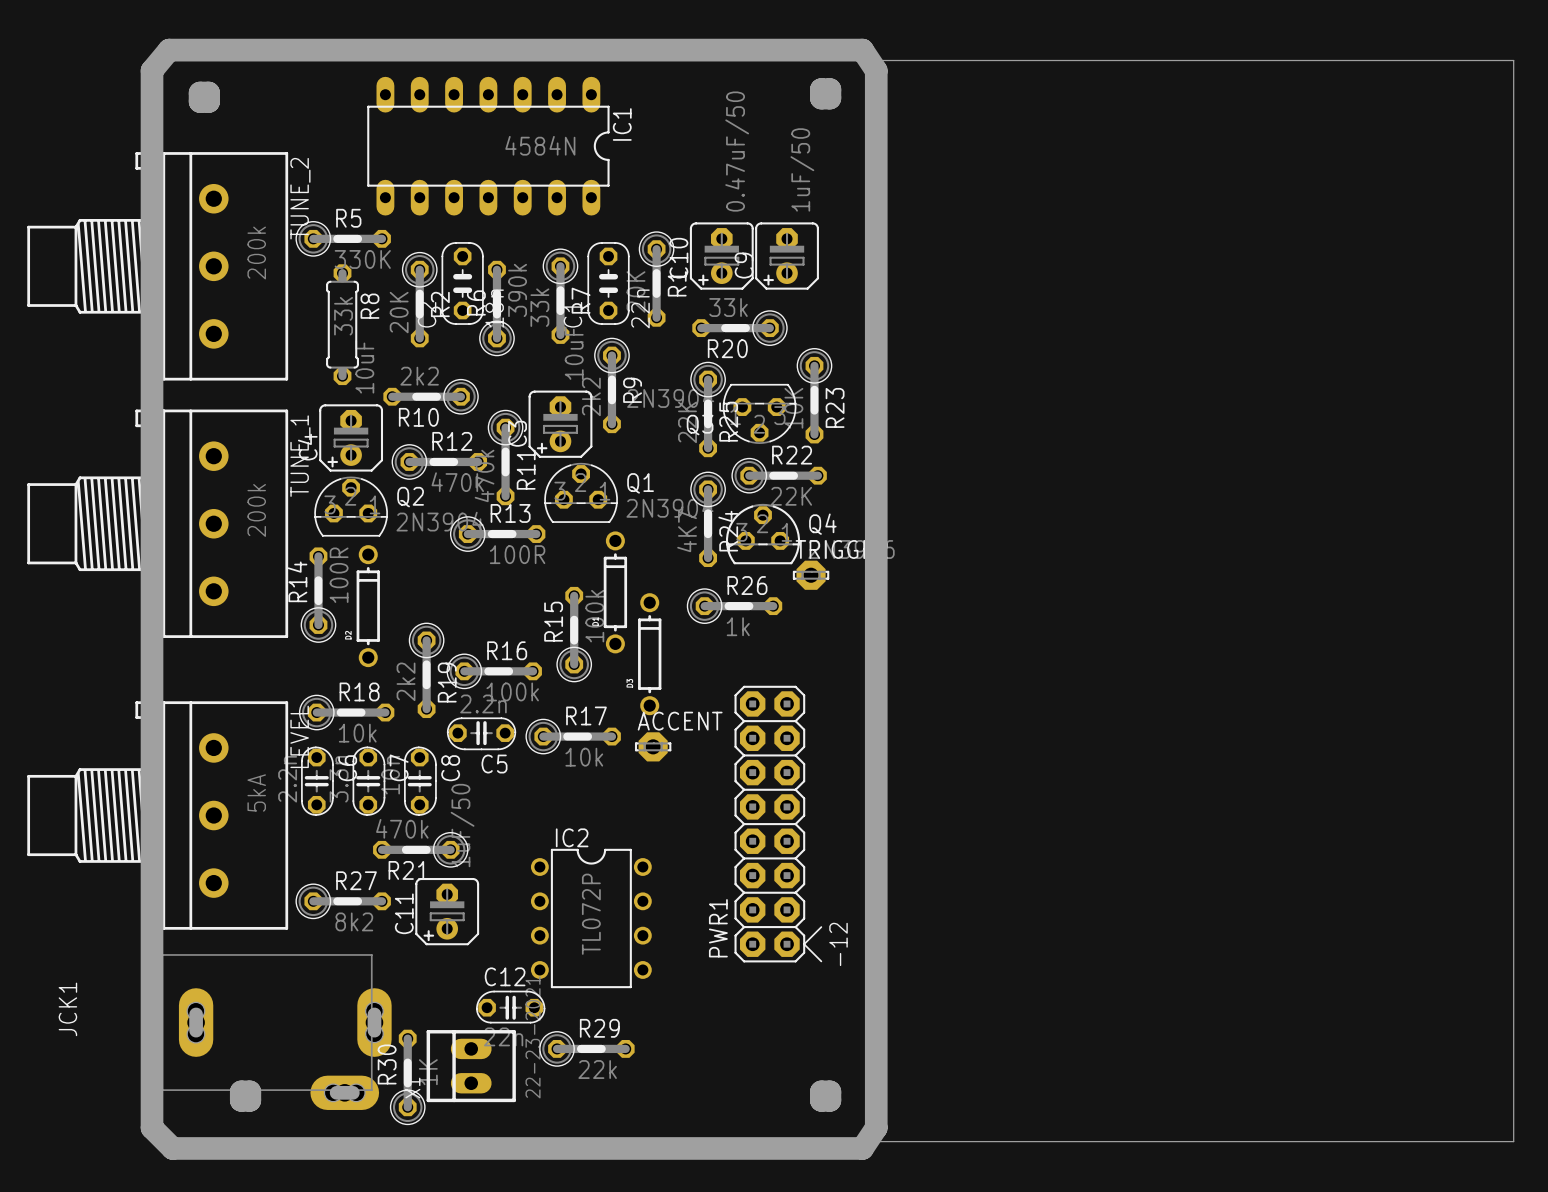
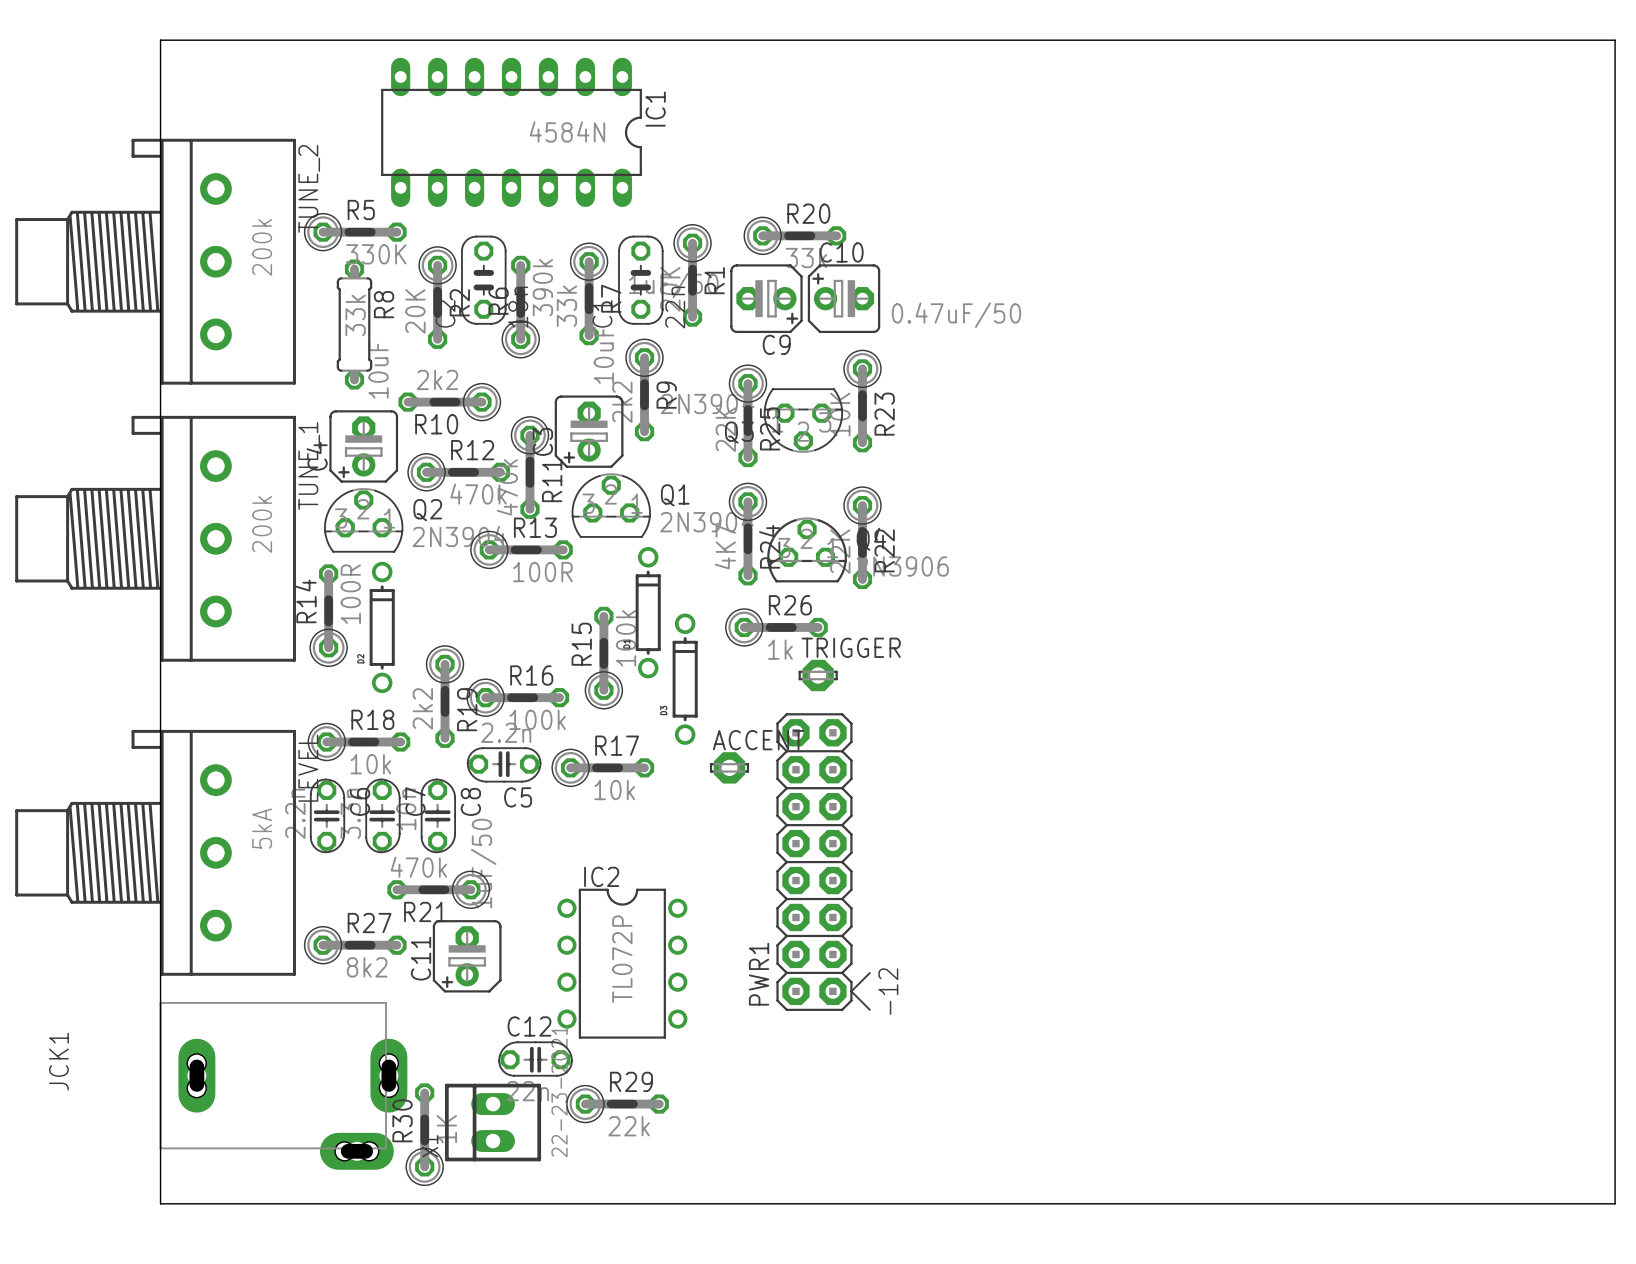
board edge: (169, 50) (862, 50) (876, 70) (876, 1127) (862, 1148) (172, 1148) (152, 1127) (152, 70) (169, 50) -> none
board edge: (821, 89) (821, 98) (829, 98) (829, 89) (821, 89) -> none
board edge: (200, 92) (200, 101) (208, 101) (208, 92) (200, 92) -> none
C10 rotation: 0° (721, 256) -> 90° clockwise (844, 298)
C10 position: (721, 256) -> (844, 298)
C9 rotation: 0° (787, 256) -> 90° counterclockwise (766, 298)
C9 position: (787, 256) -> (766, 298)
R20 rotation: 0° (740, 328) -> 180° (794, 235)
R20 position: (740, 328) -> (794, 235)
R22 rotation: 0° (779, 475) -> 90° clockwise (862, 537)
R22 position: (779, 475) -> (862, 537)
TRIGGER position: (811, 575) -> (818, 675)
ACCENT position: (653, 746) -> (729, 767)
board edge: (241, 1091) (241, 1100) (249, 1100) (249, 1091) (241, 1091) -> none
board edge: (821, 1091) (821, 1100) (829, 1100) (829, 1091) (821, 1091) -> none

